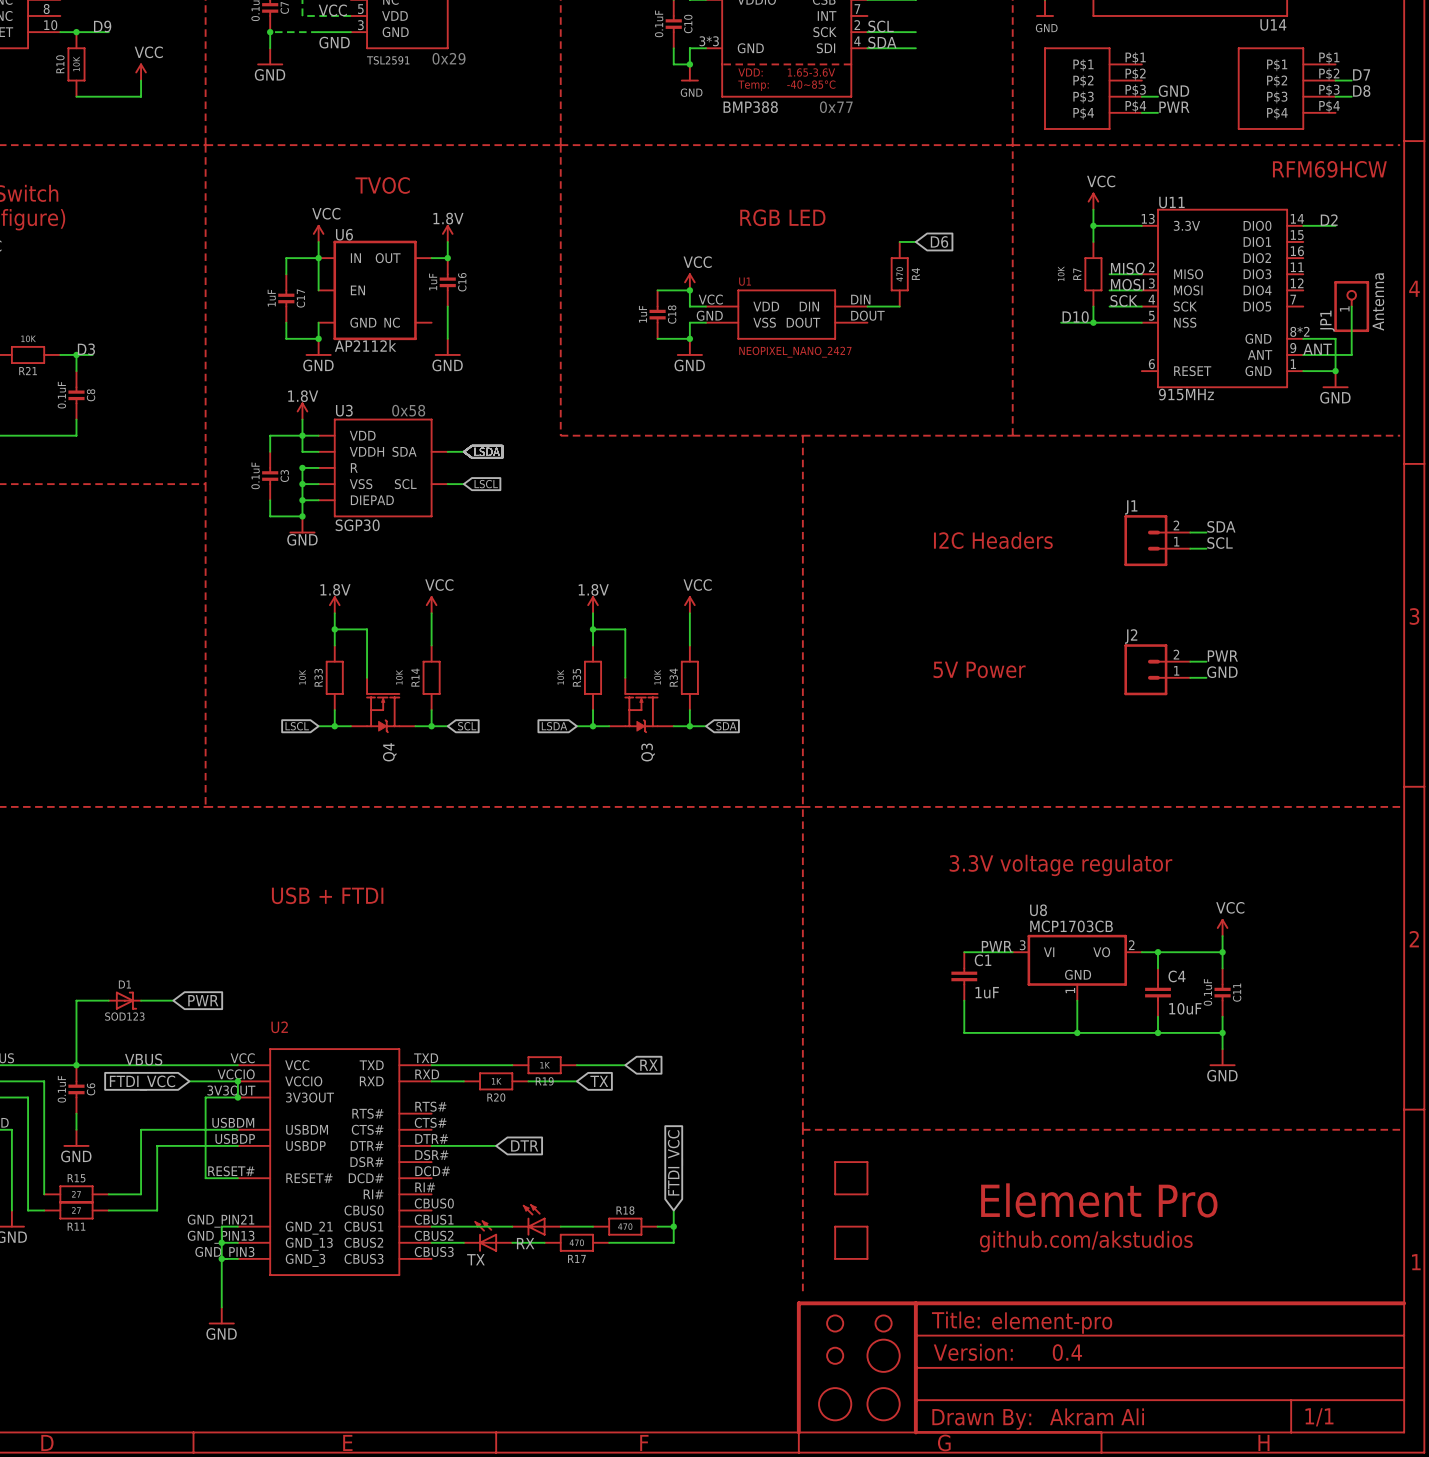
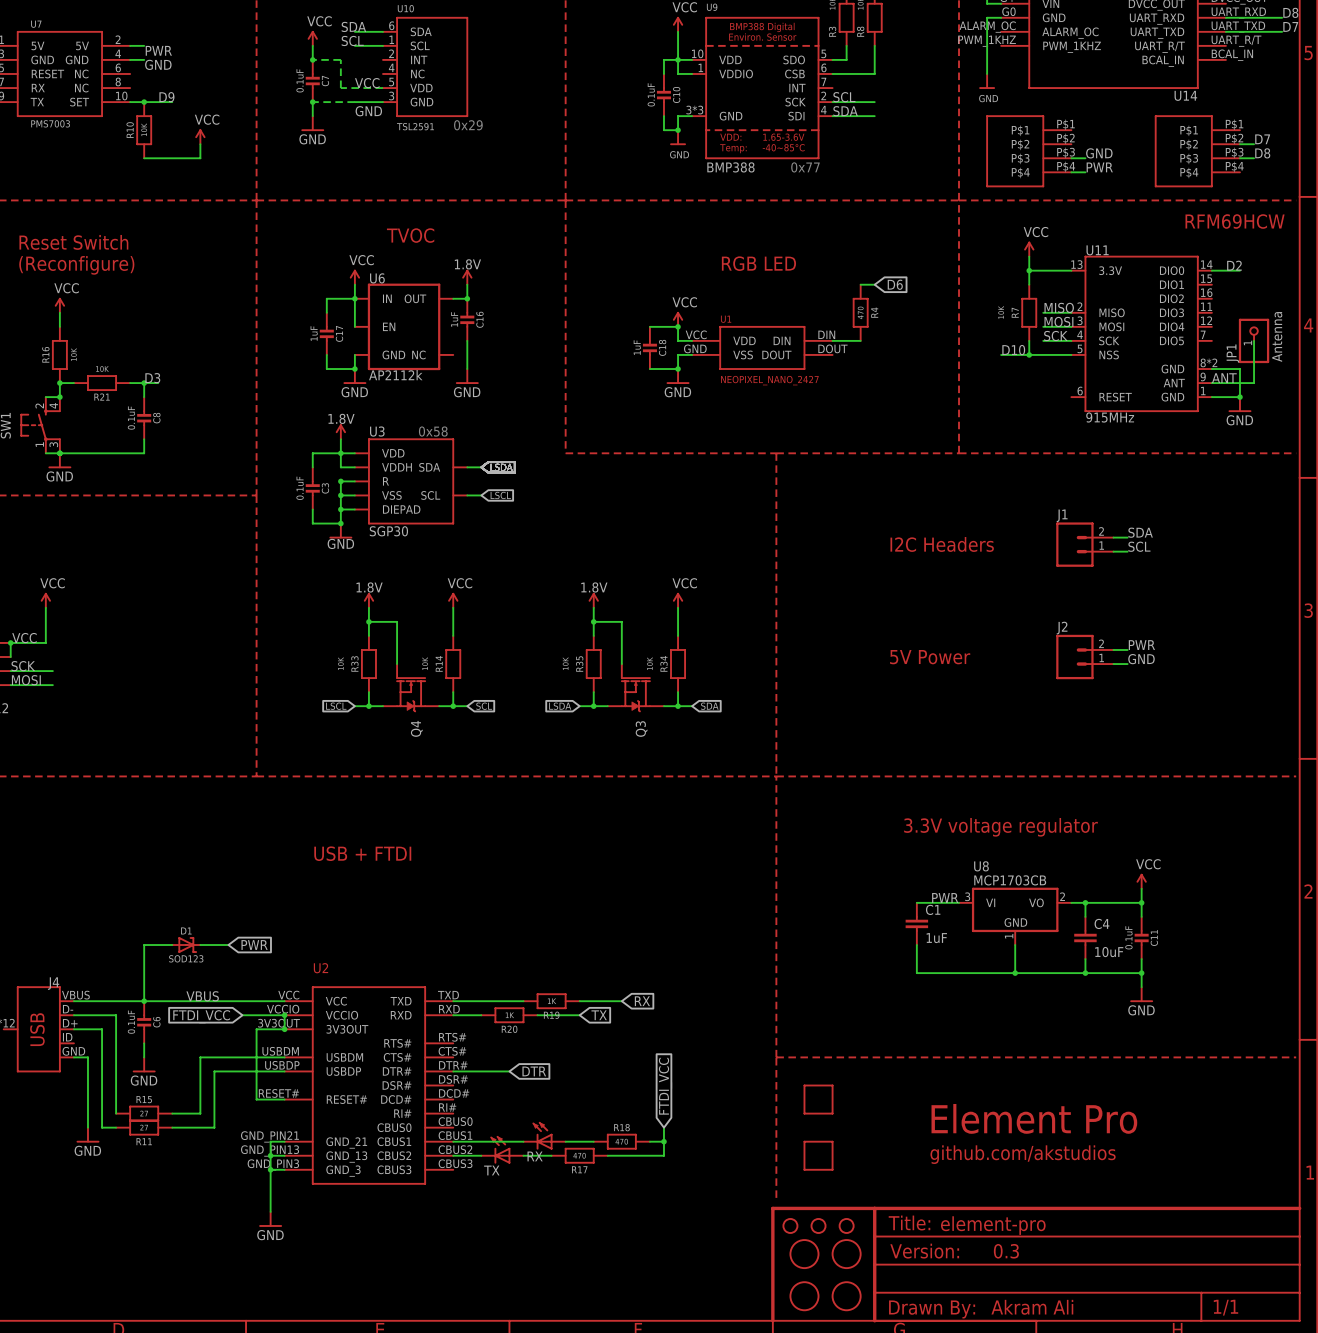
part: none -> (790, 1225)
part: (835, 1323) -> none
part: none -> (818, 1225)
part symbol: [826, 1346, 845, 1365] -> [789, 1239, 820, 1269]
text: 0.4 (1067, 1352) -> 0.3 (1006, 1251)

